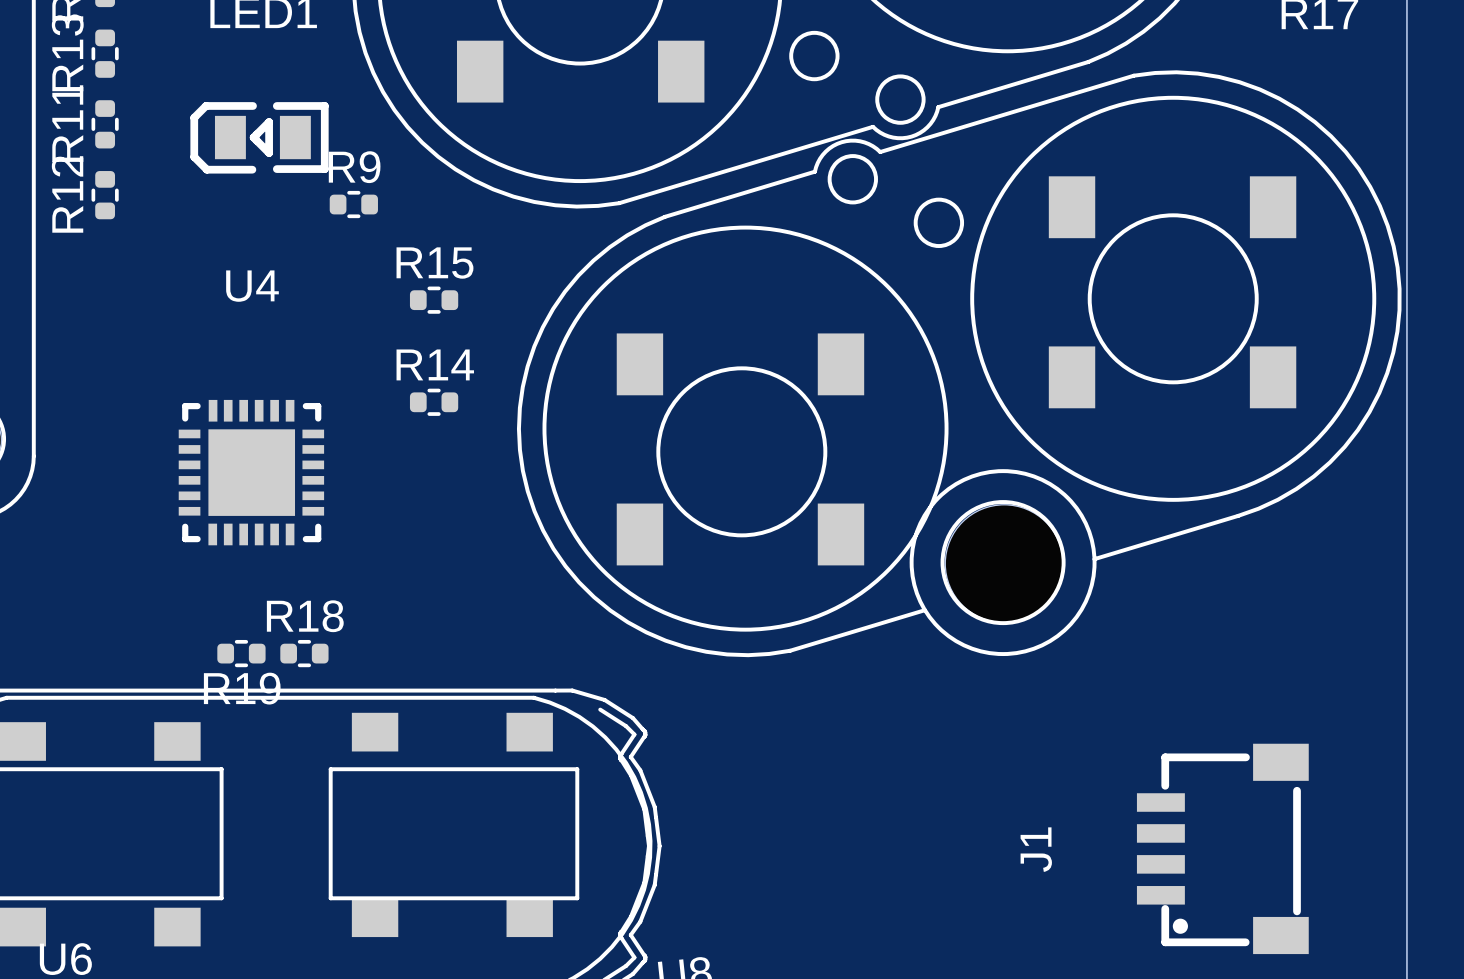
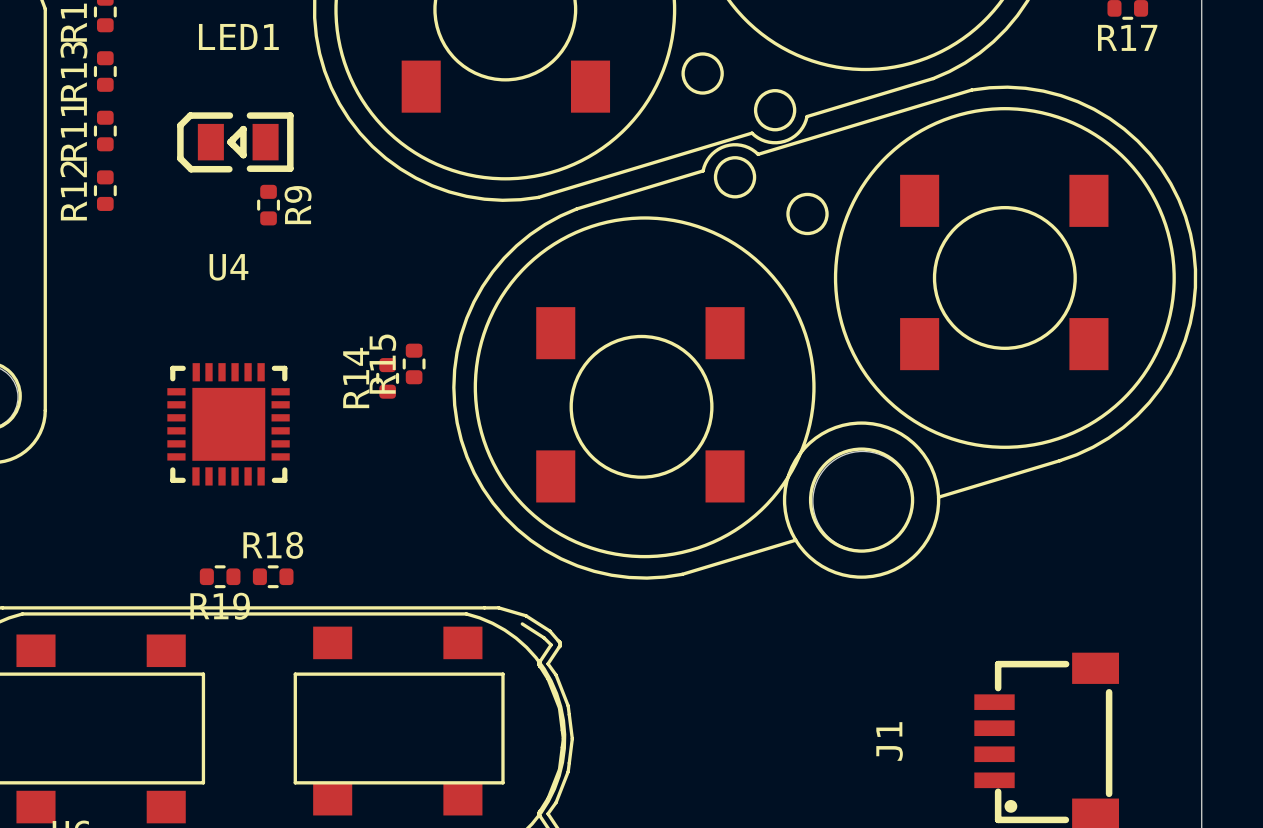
R9 rotation: 0° (353, 204) -> 90° clockwise (268, 205)
R9 position: (353, 204) -> (268, 205)
R15 rotation: 0° (434, 300) -> 90° clockwise (414, 363)
R15 position: (434, 300) -> (414, 363)
R14 rotation: 0° (434, 402) -> 90° clockwise (387, 378)

